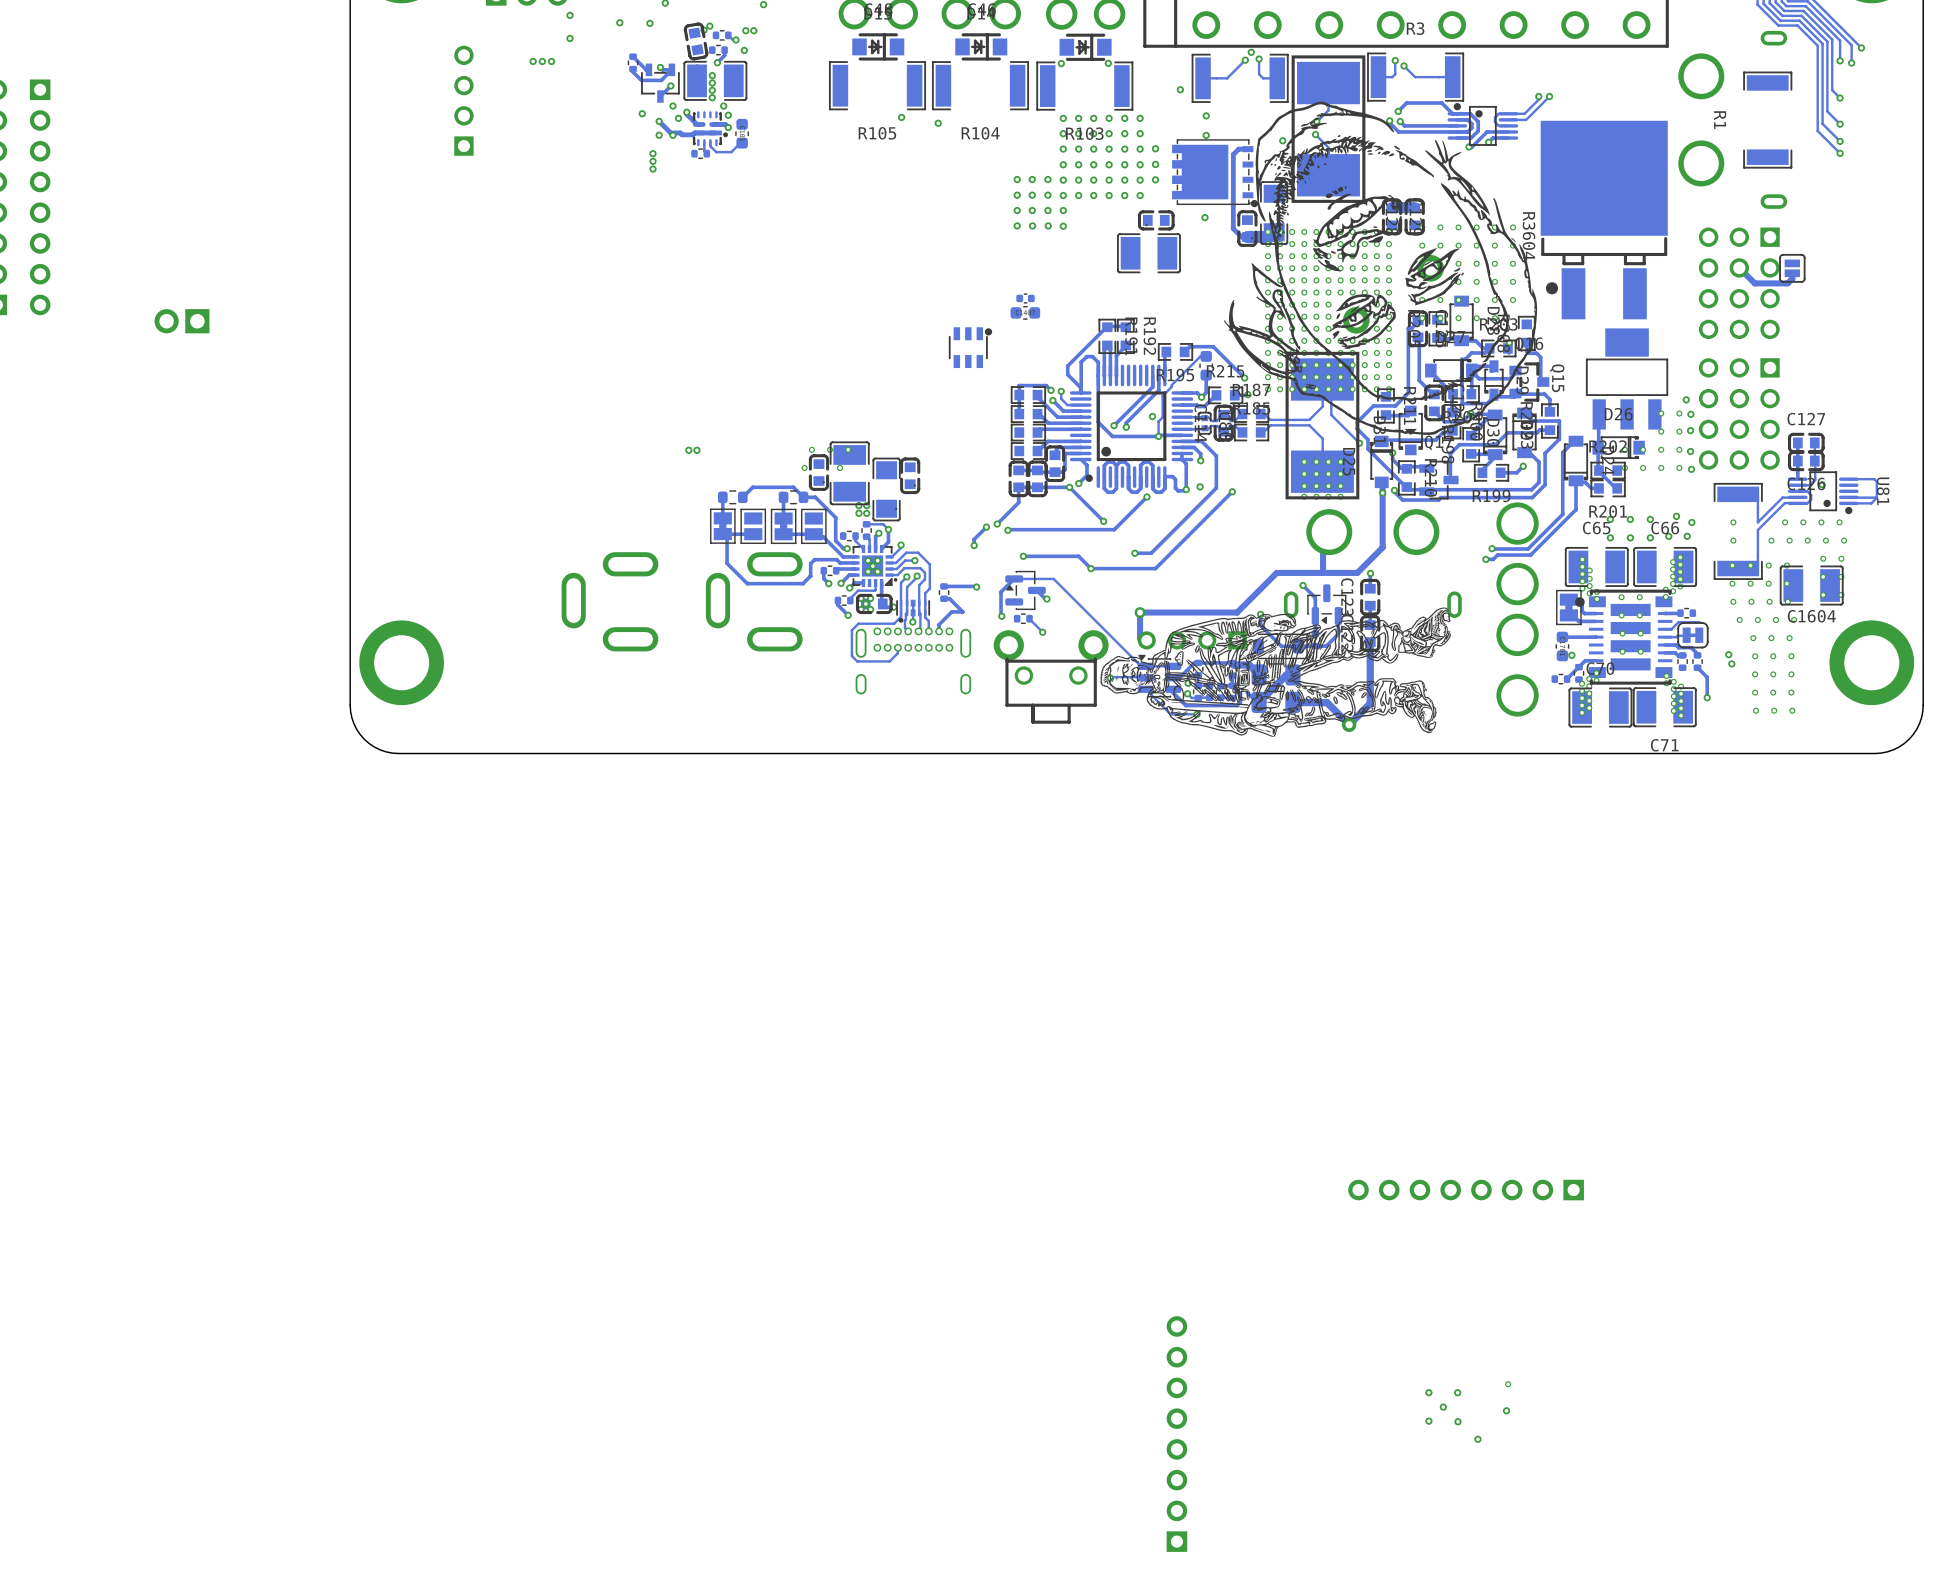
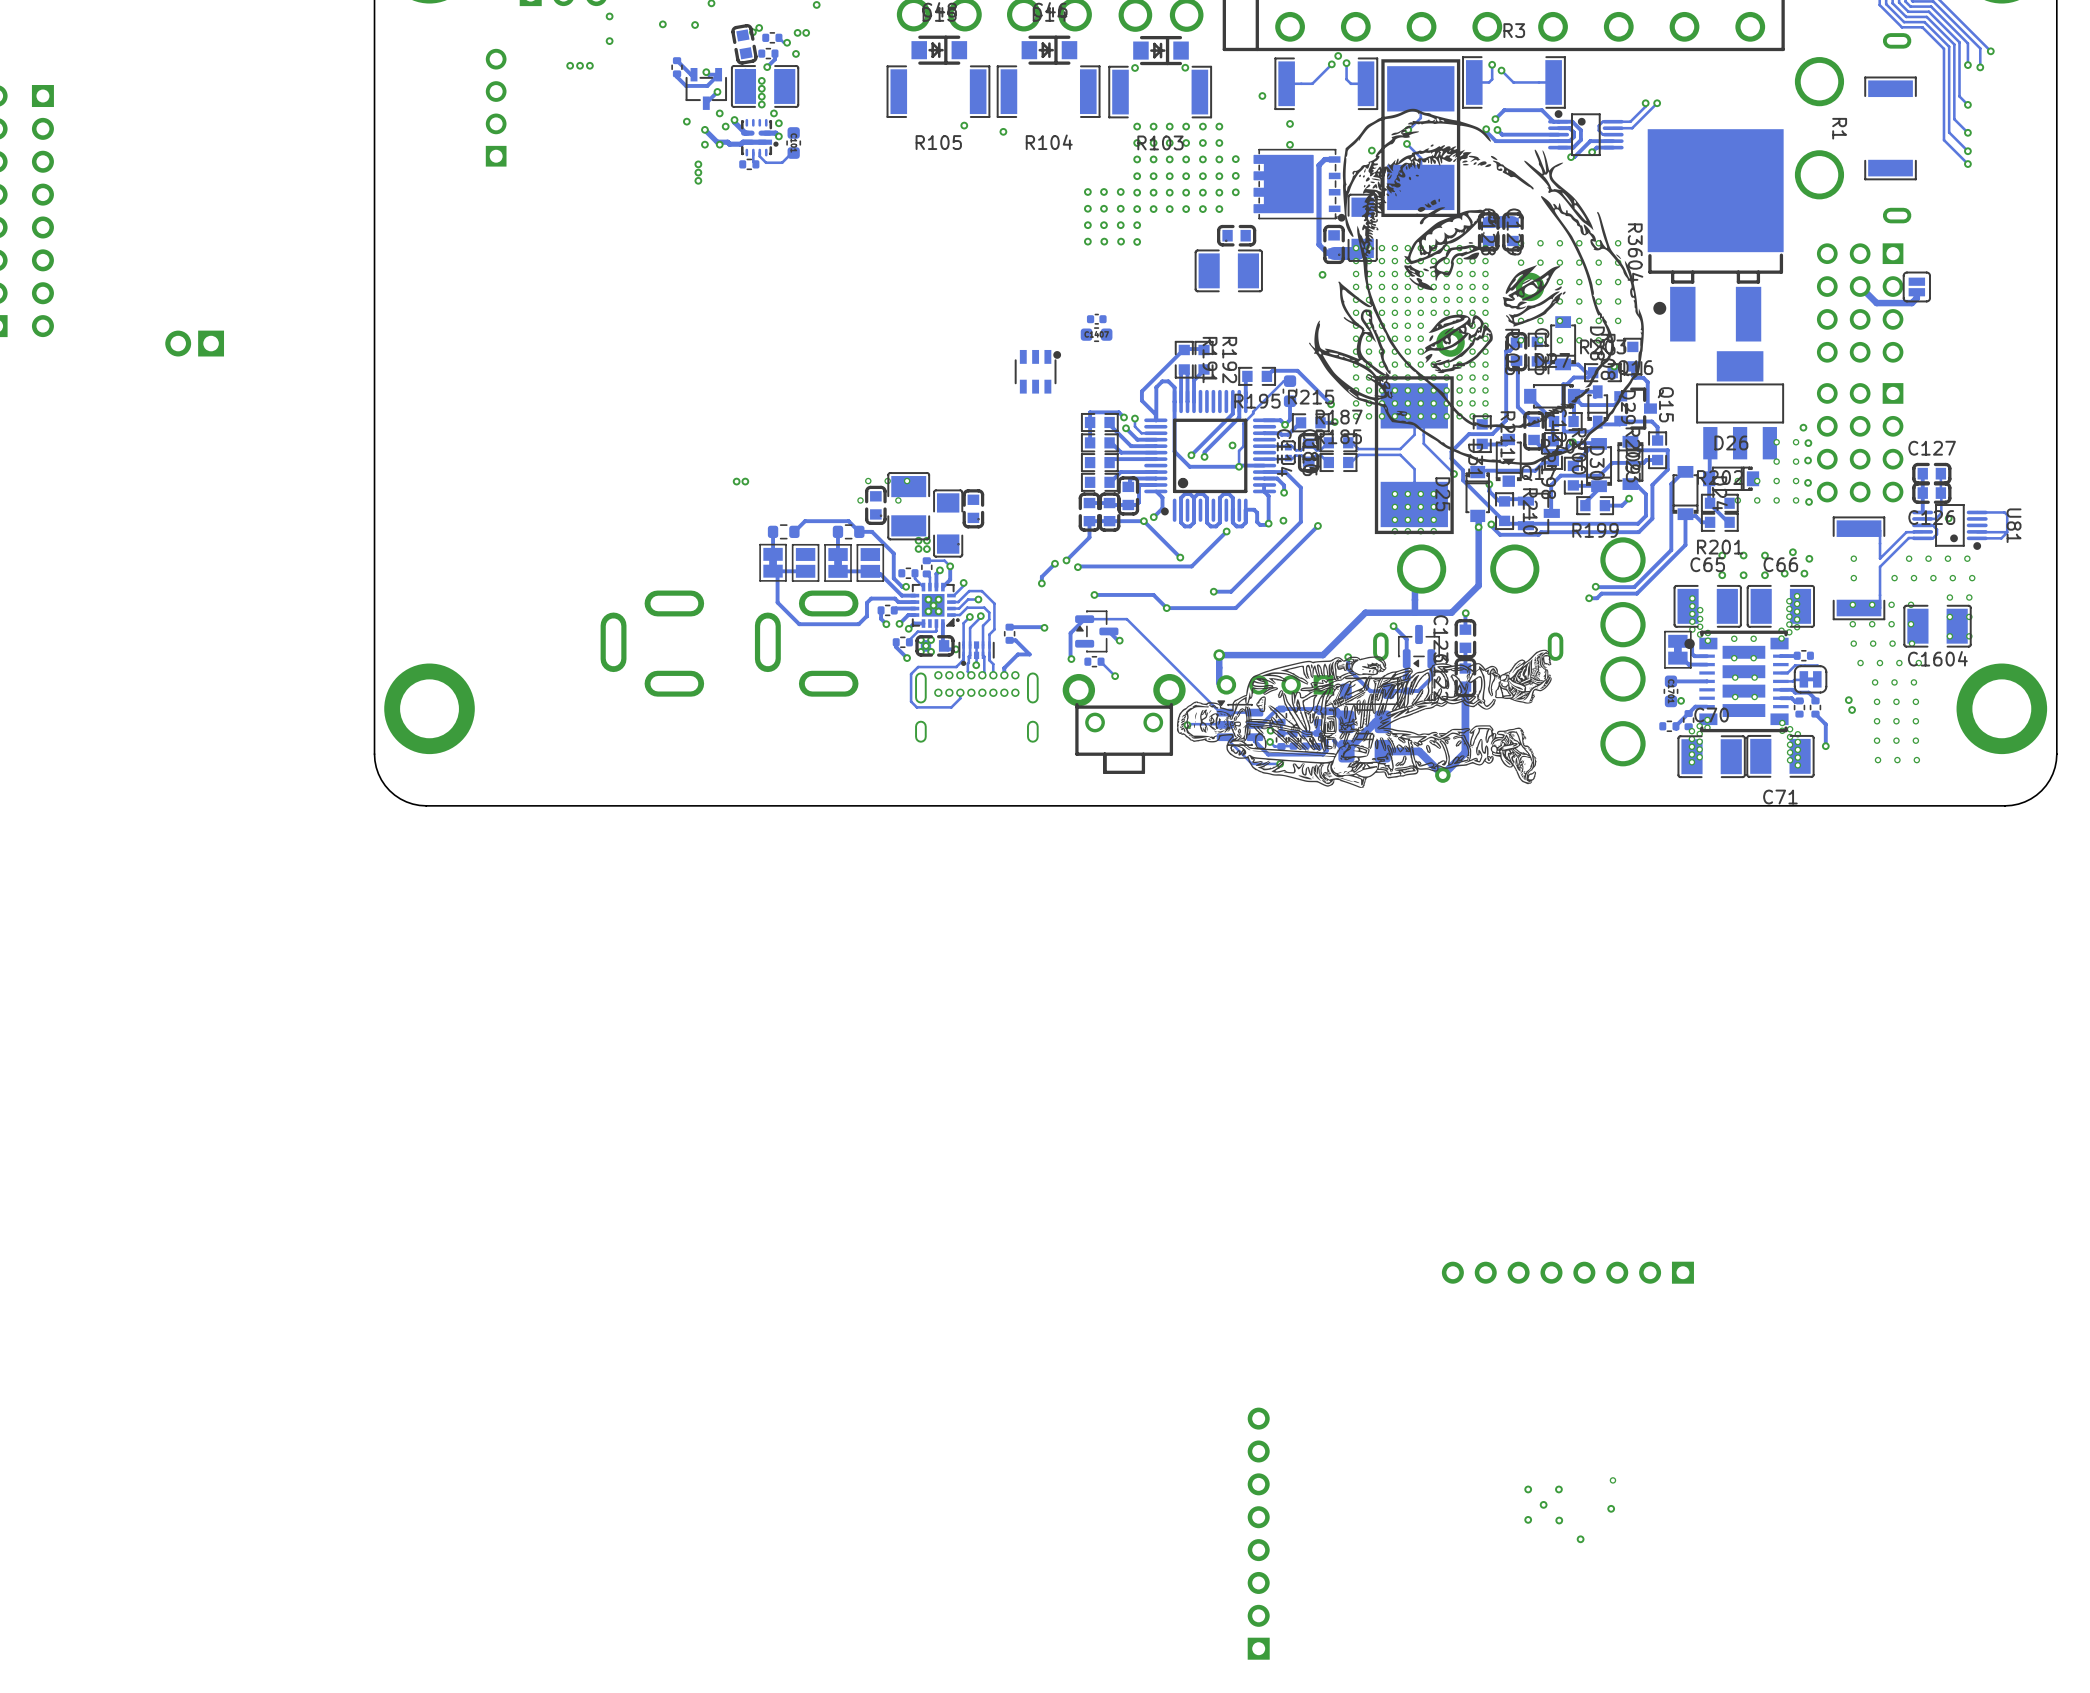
via position: (1204, 217) -> (1322, 274)

